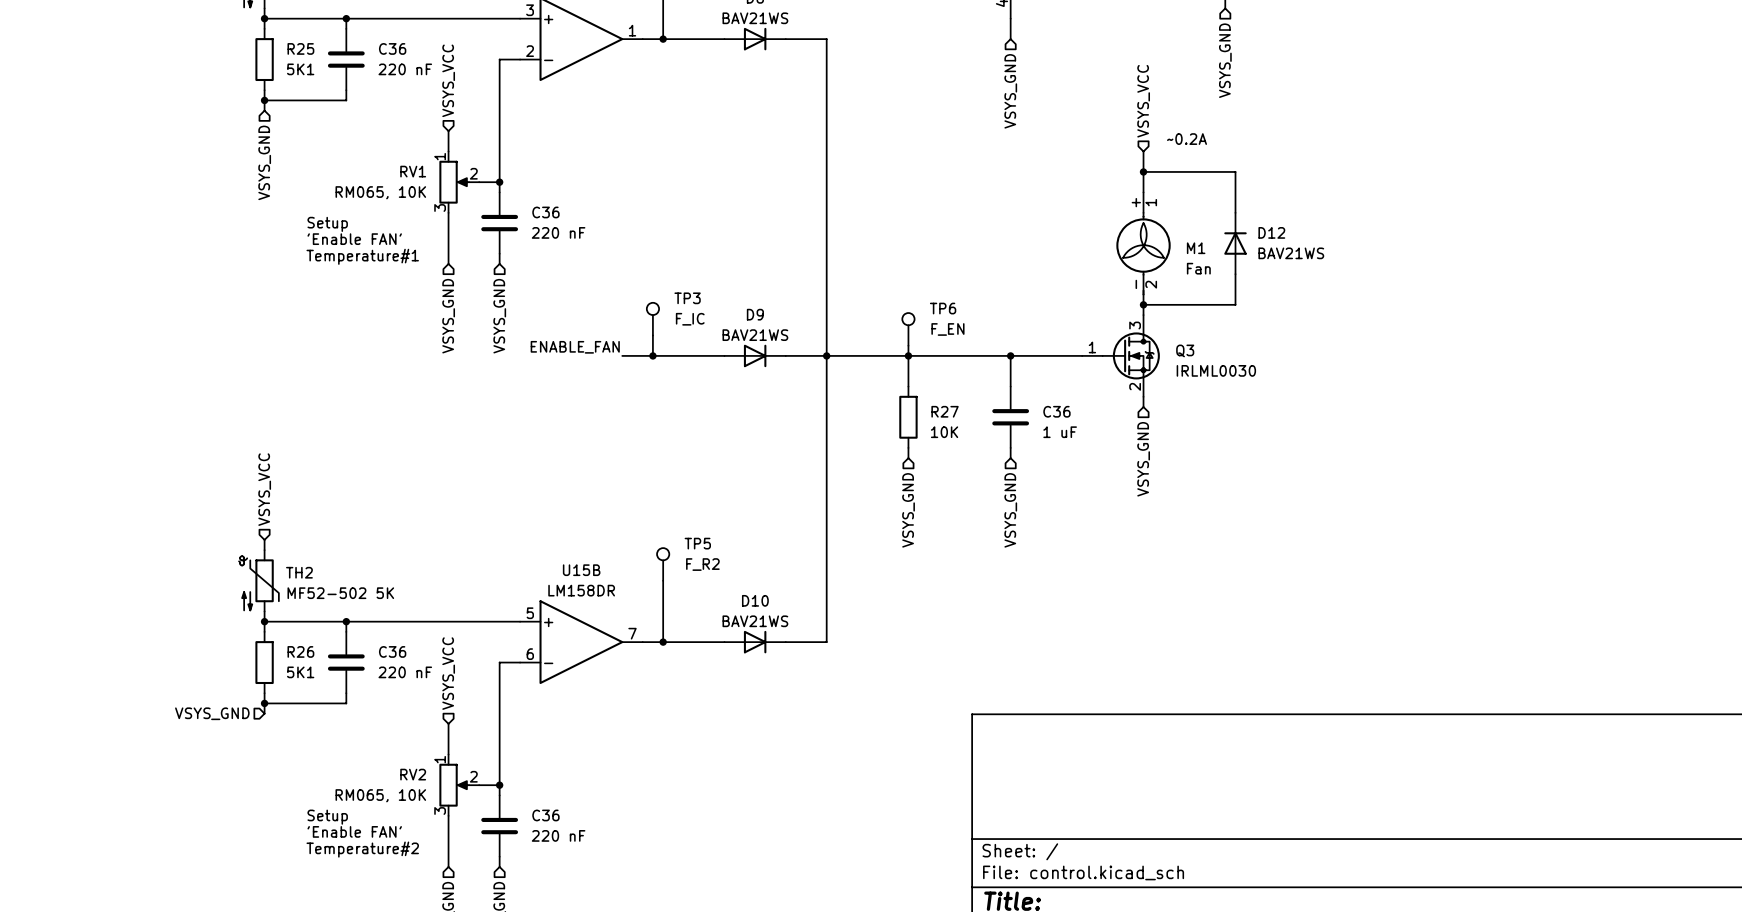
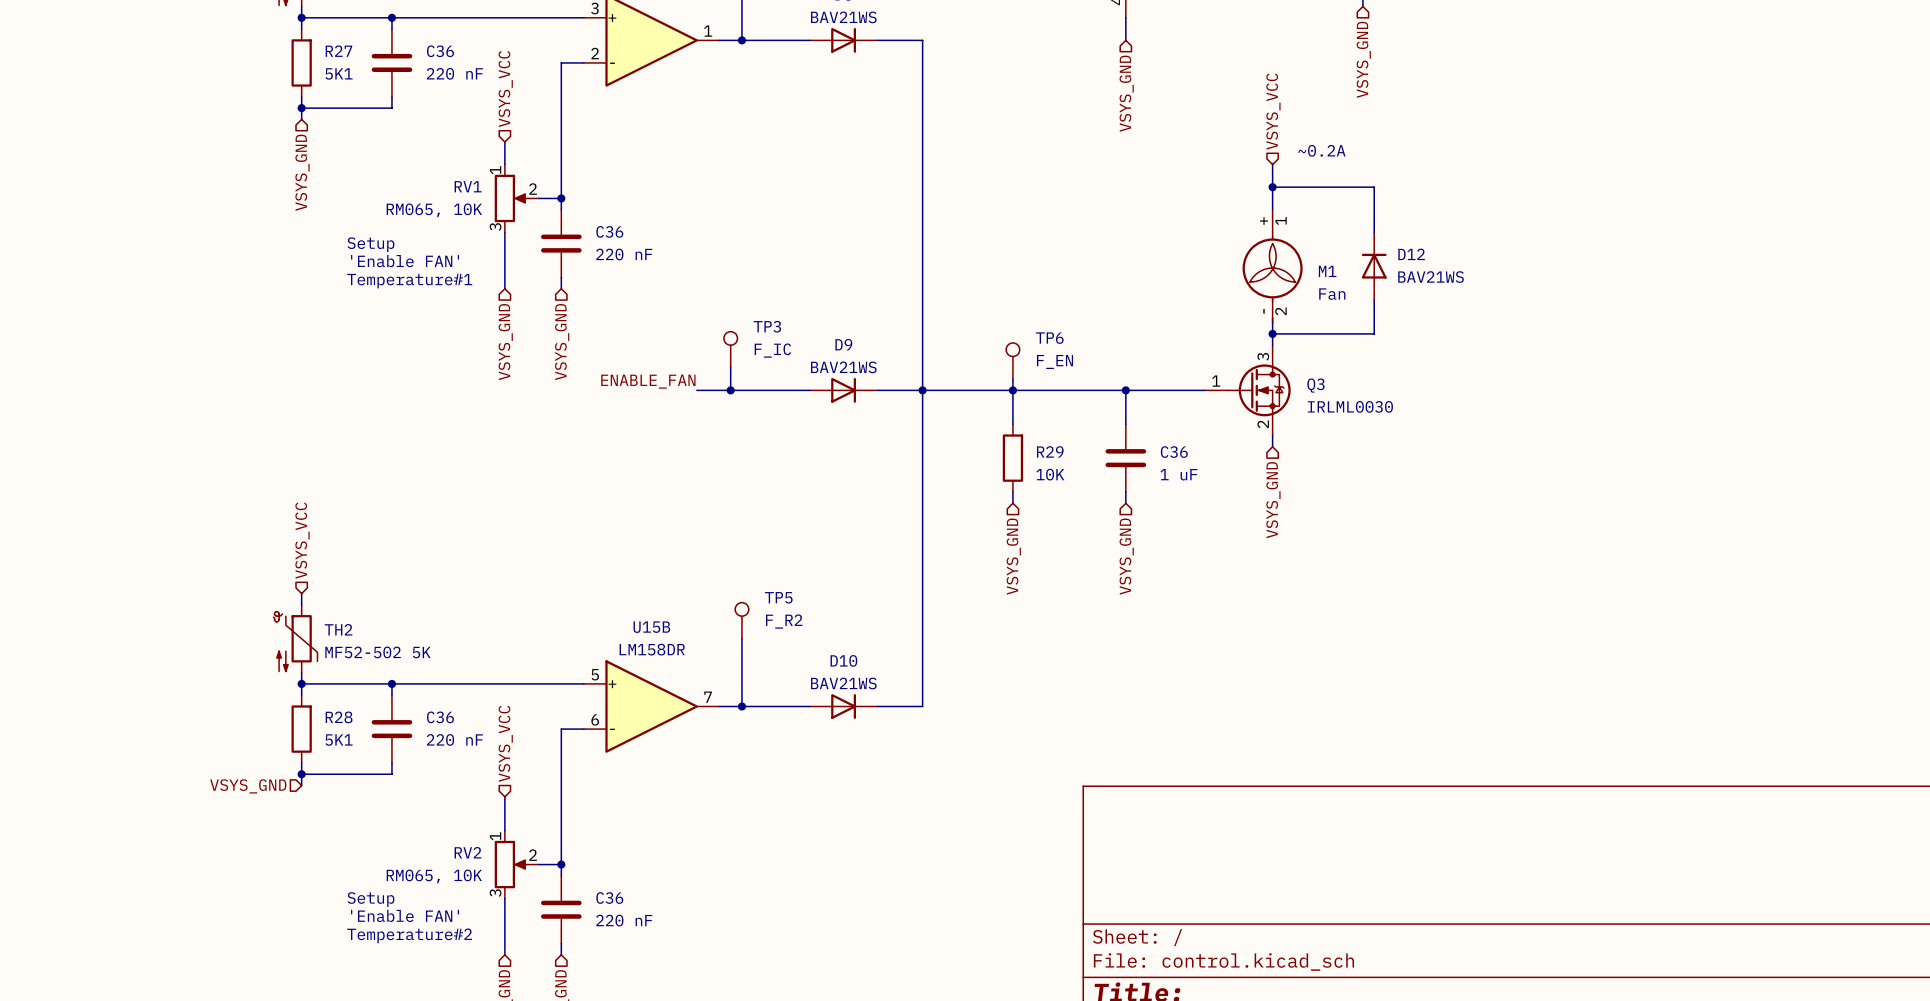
R25 name: R25 (300, 48) -> R27 (338, 51)
R27 name: R27 (945, 411) -> R29 (1050, 451)
R26 name: R26 (300, 651) -> R28 (339, 717)

